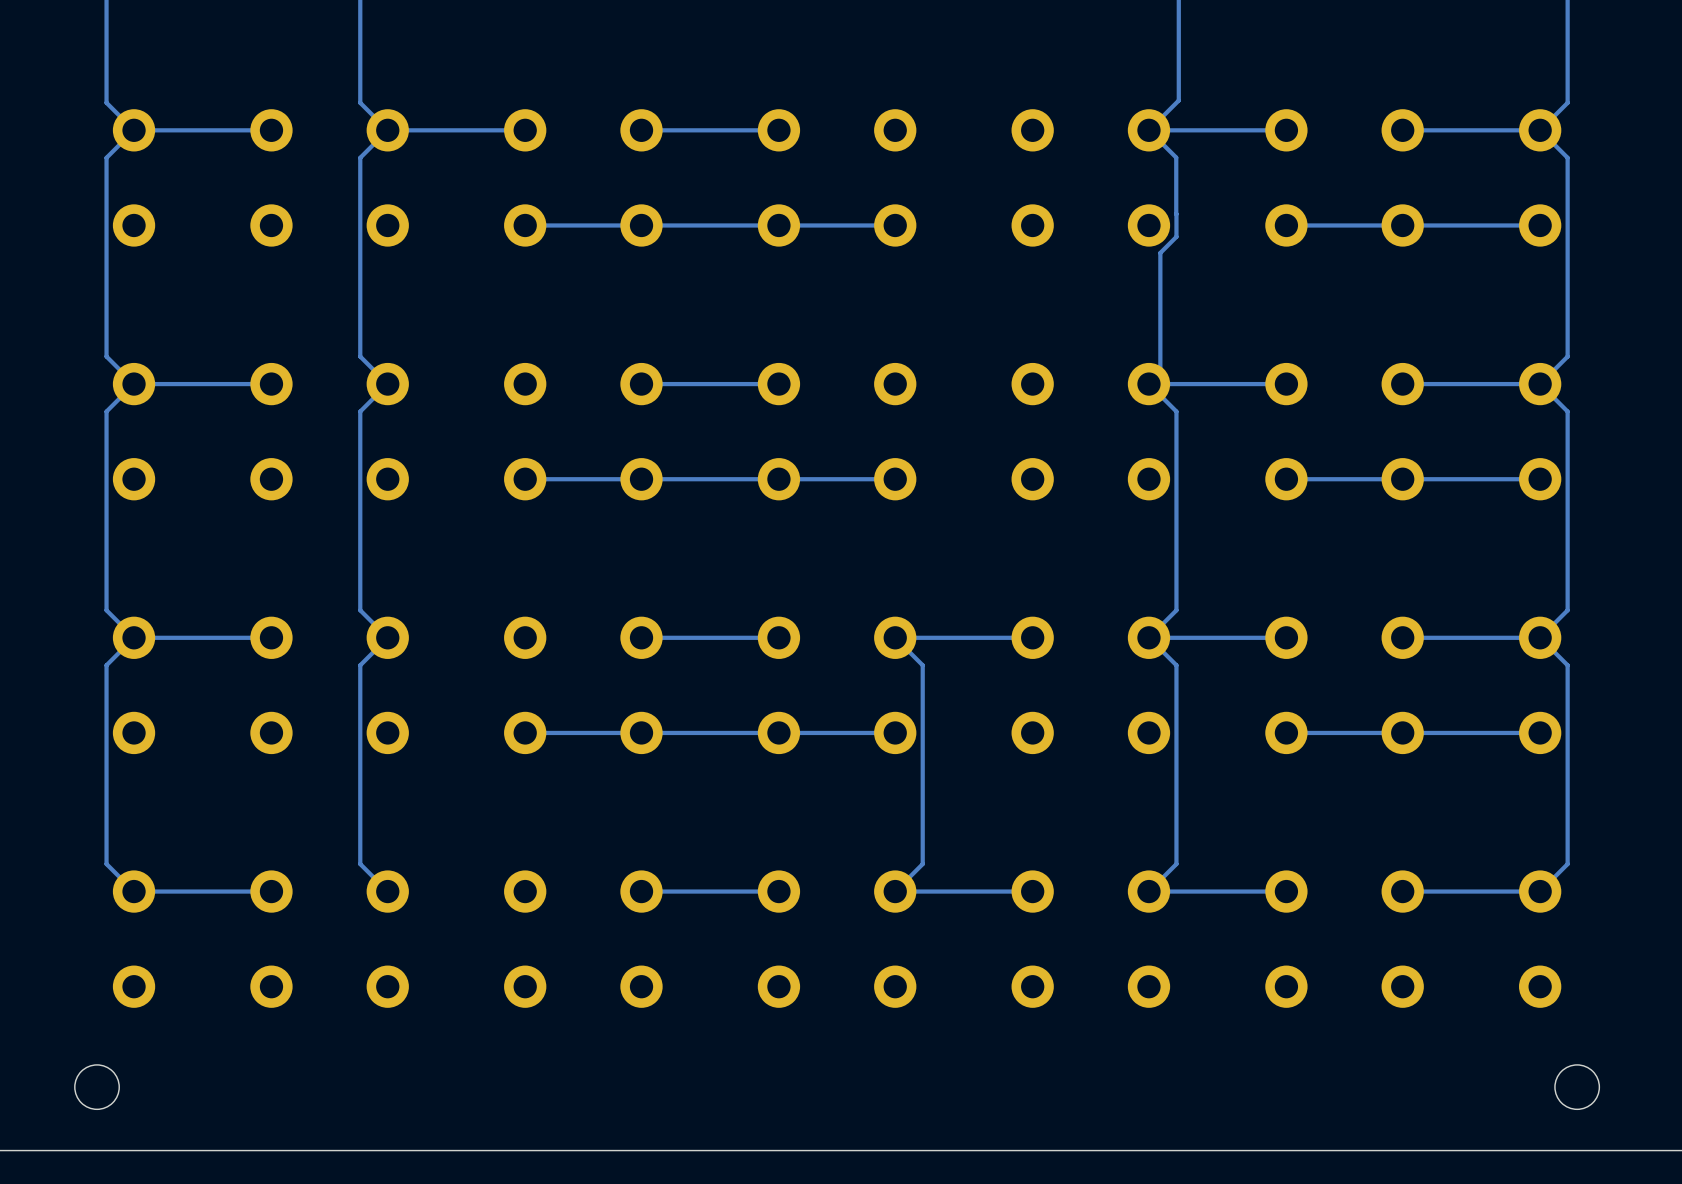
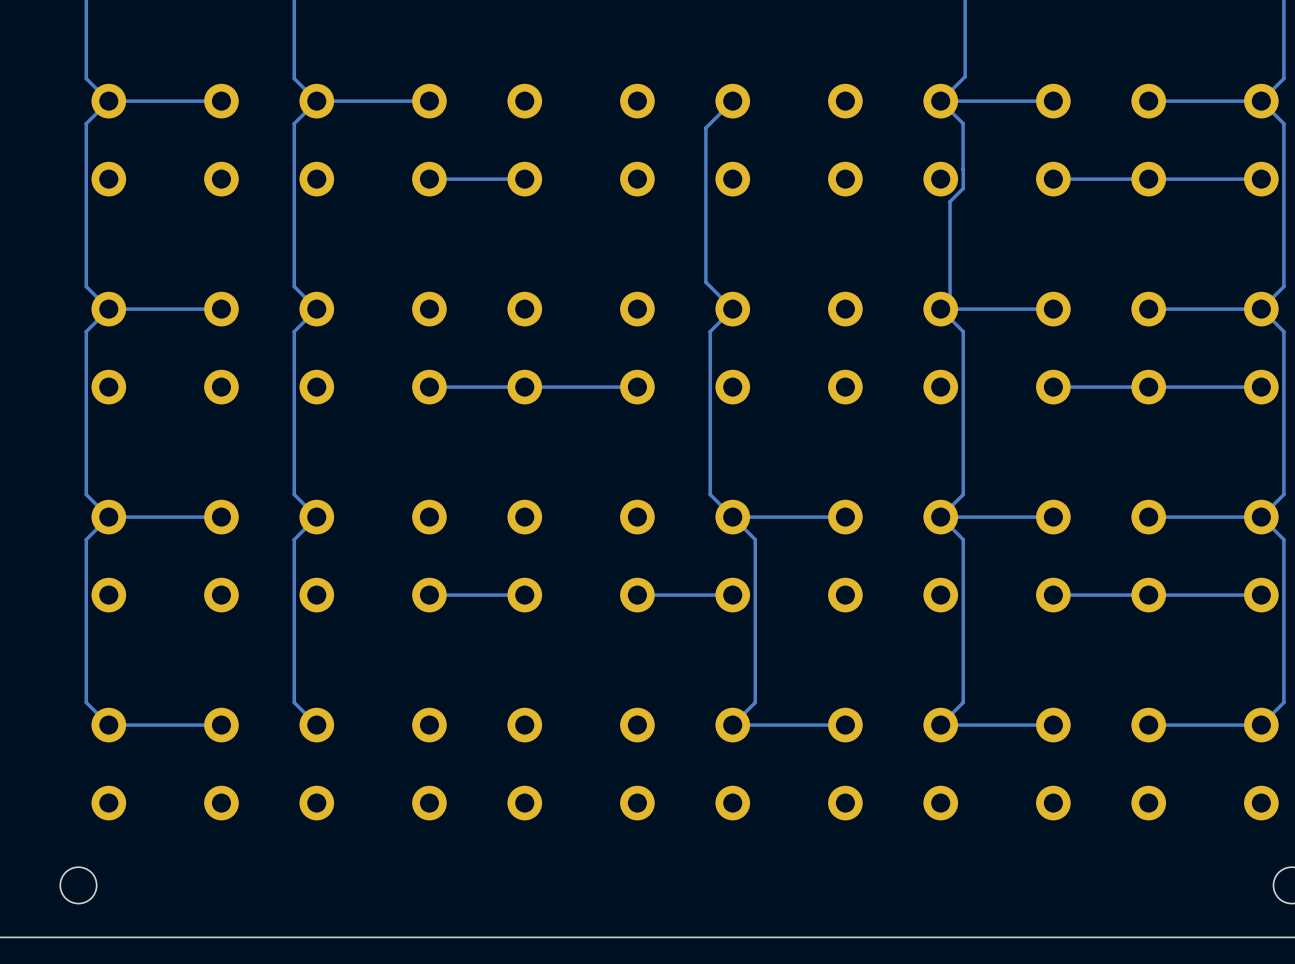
track: (778, 130) (641, 130) -> none
track: none -> (732, 101) (705, 128) (705, 282) (732, 309) (710, 331) (710, 494) (732, 517)
track: (895, 225) (641, 225) -> none
track: (778, 384) (641, 384) -> none
track: (895, 479) (778, 479) -> none
track: (778, 637) (641, 637) -> none
track: (778, 732) (641, 732) -> none
track: (778, 891) (641, 891) -> none

